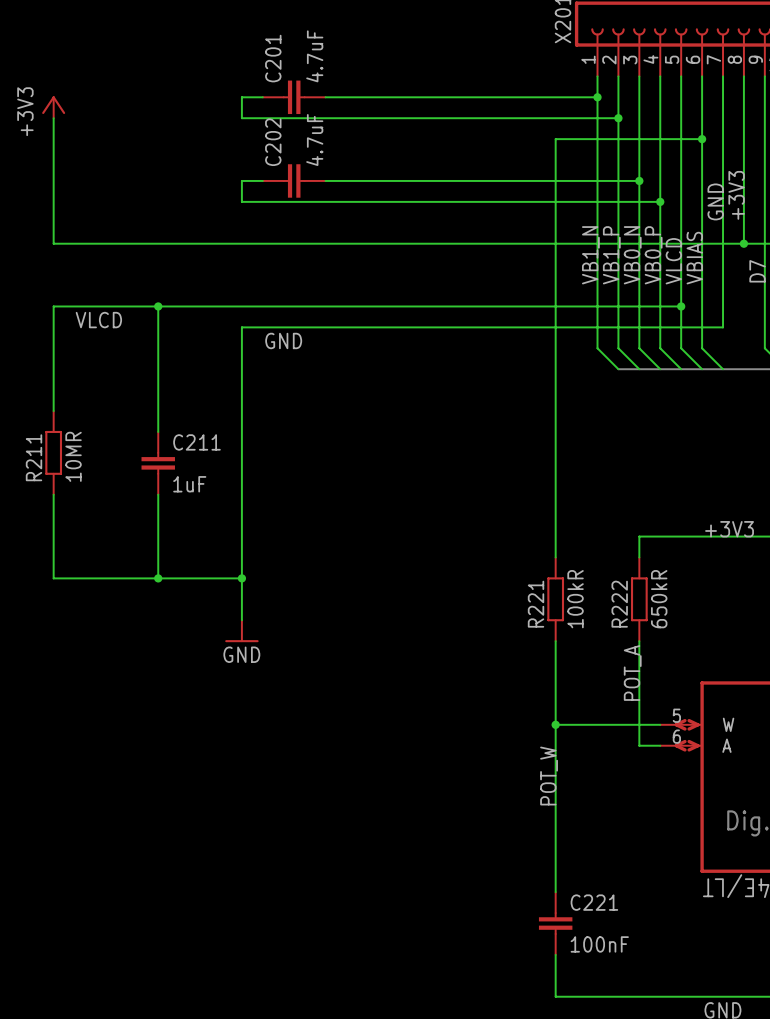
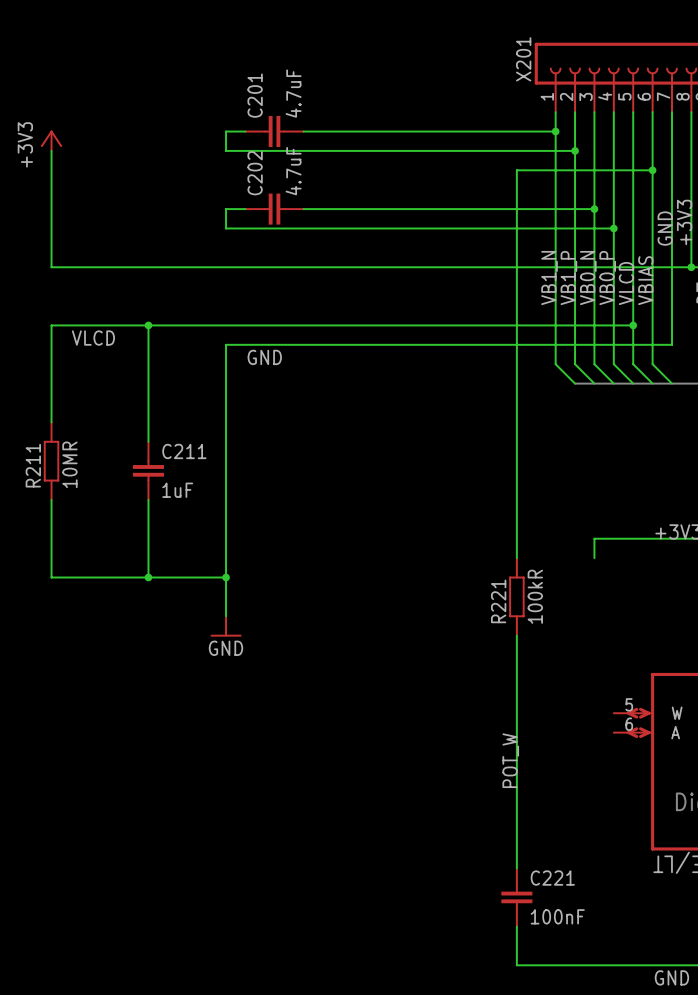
R222: 650kR (639, 599) -> none
wire: (639, 641) (639, 745) (660, 745) -> none
label: POT_A (632, 673) -> none
wire: (555, 724) (660, 724) -> none
junction: (555, 724) -> none

